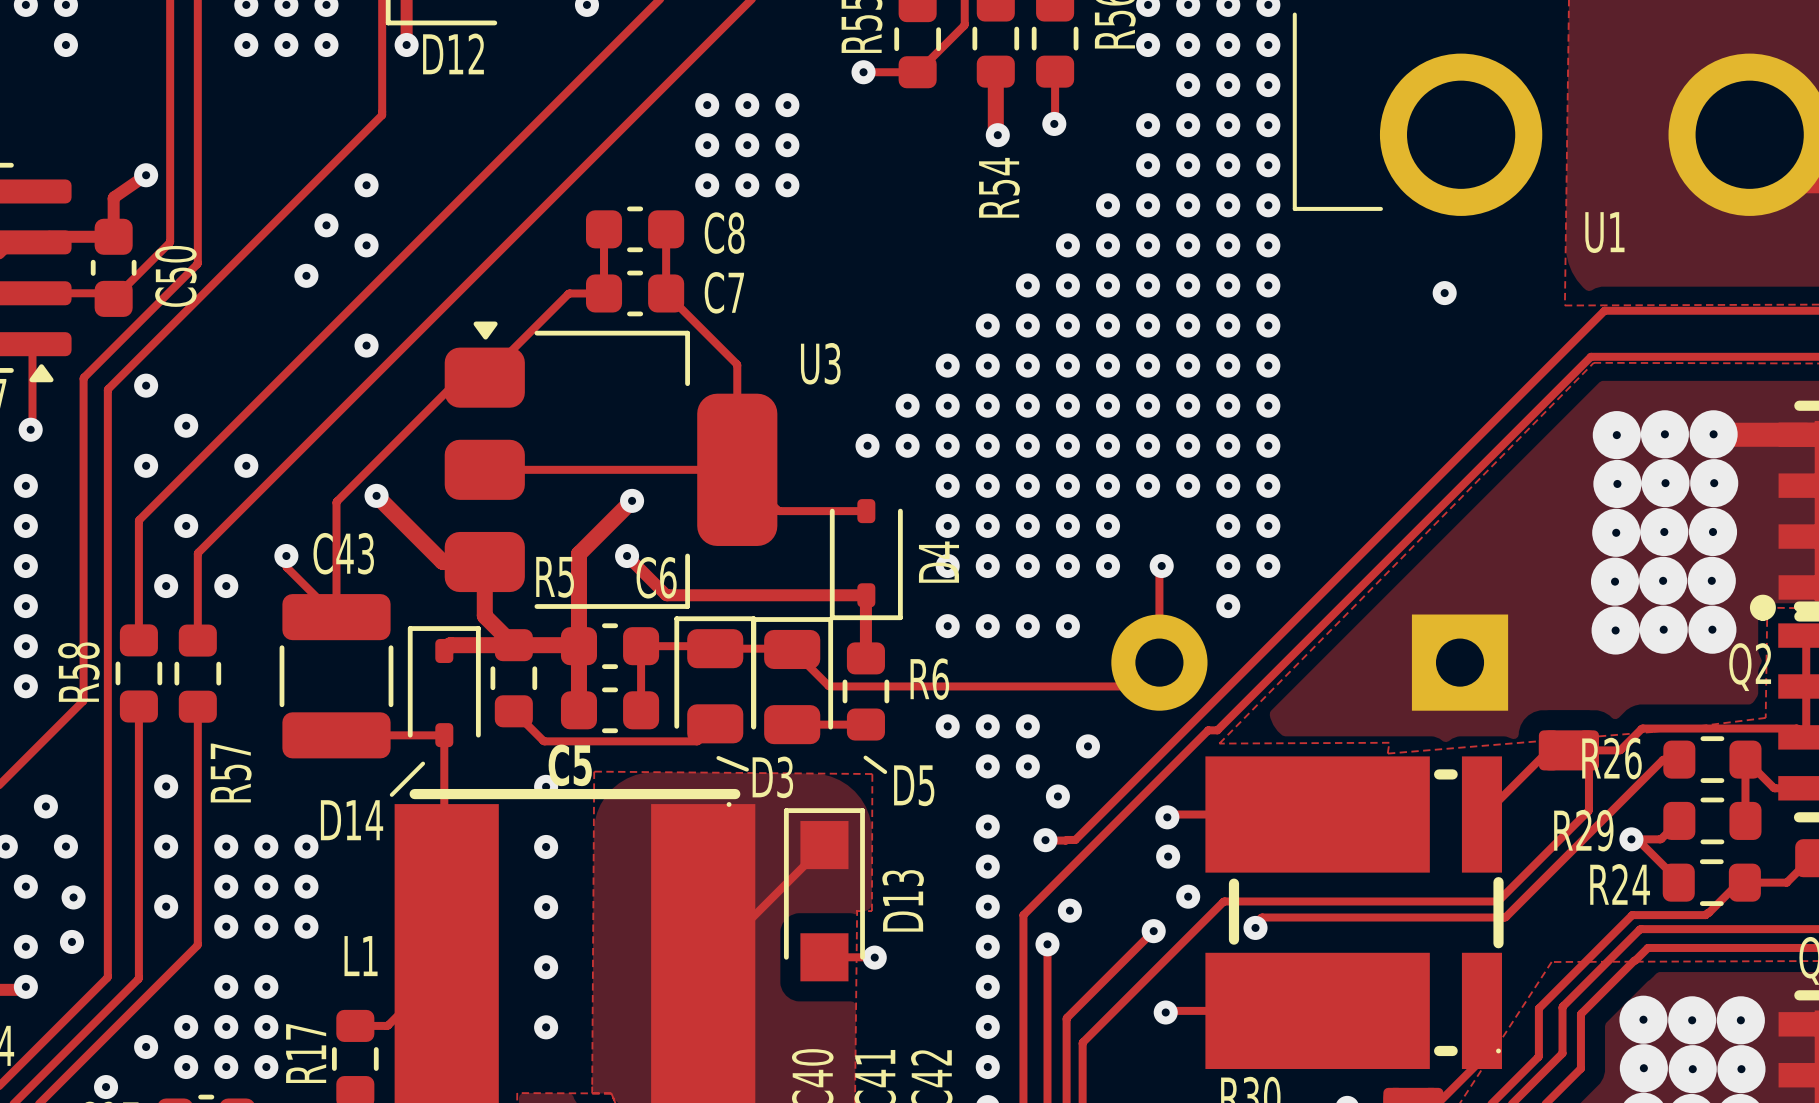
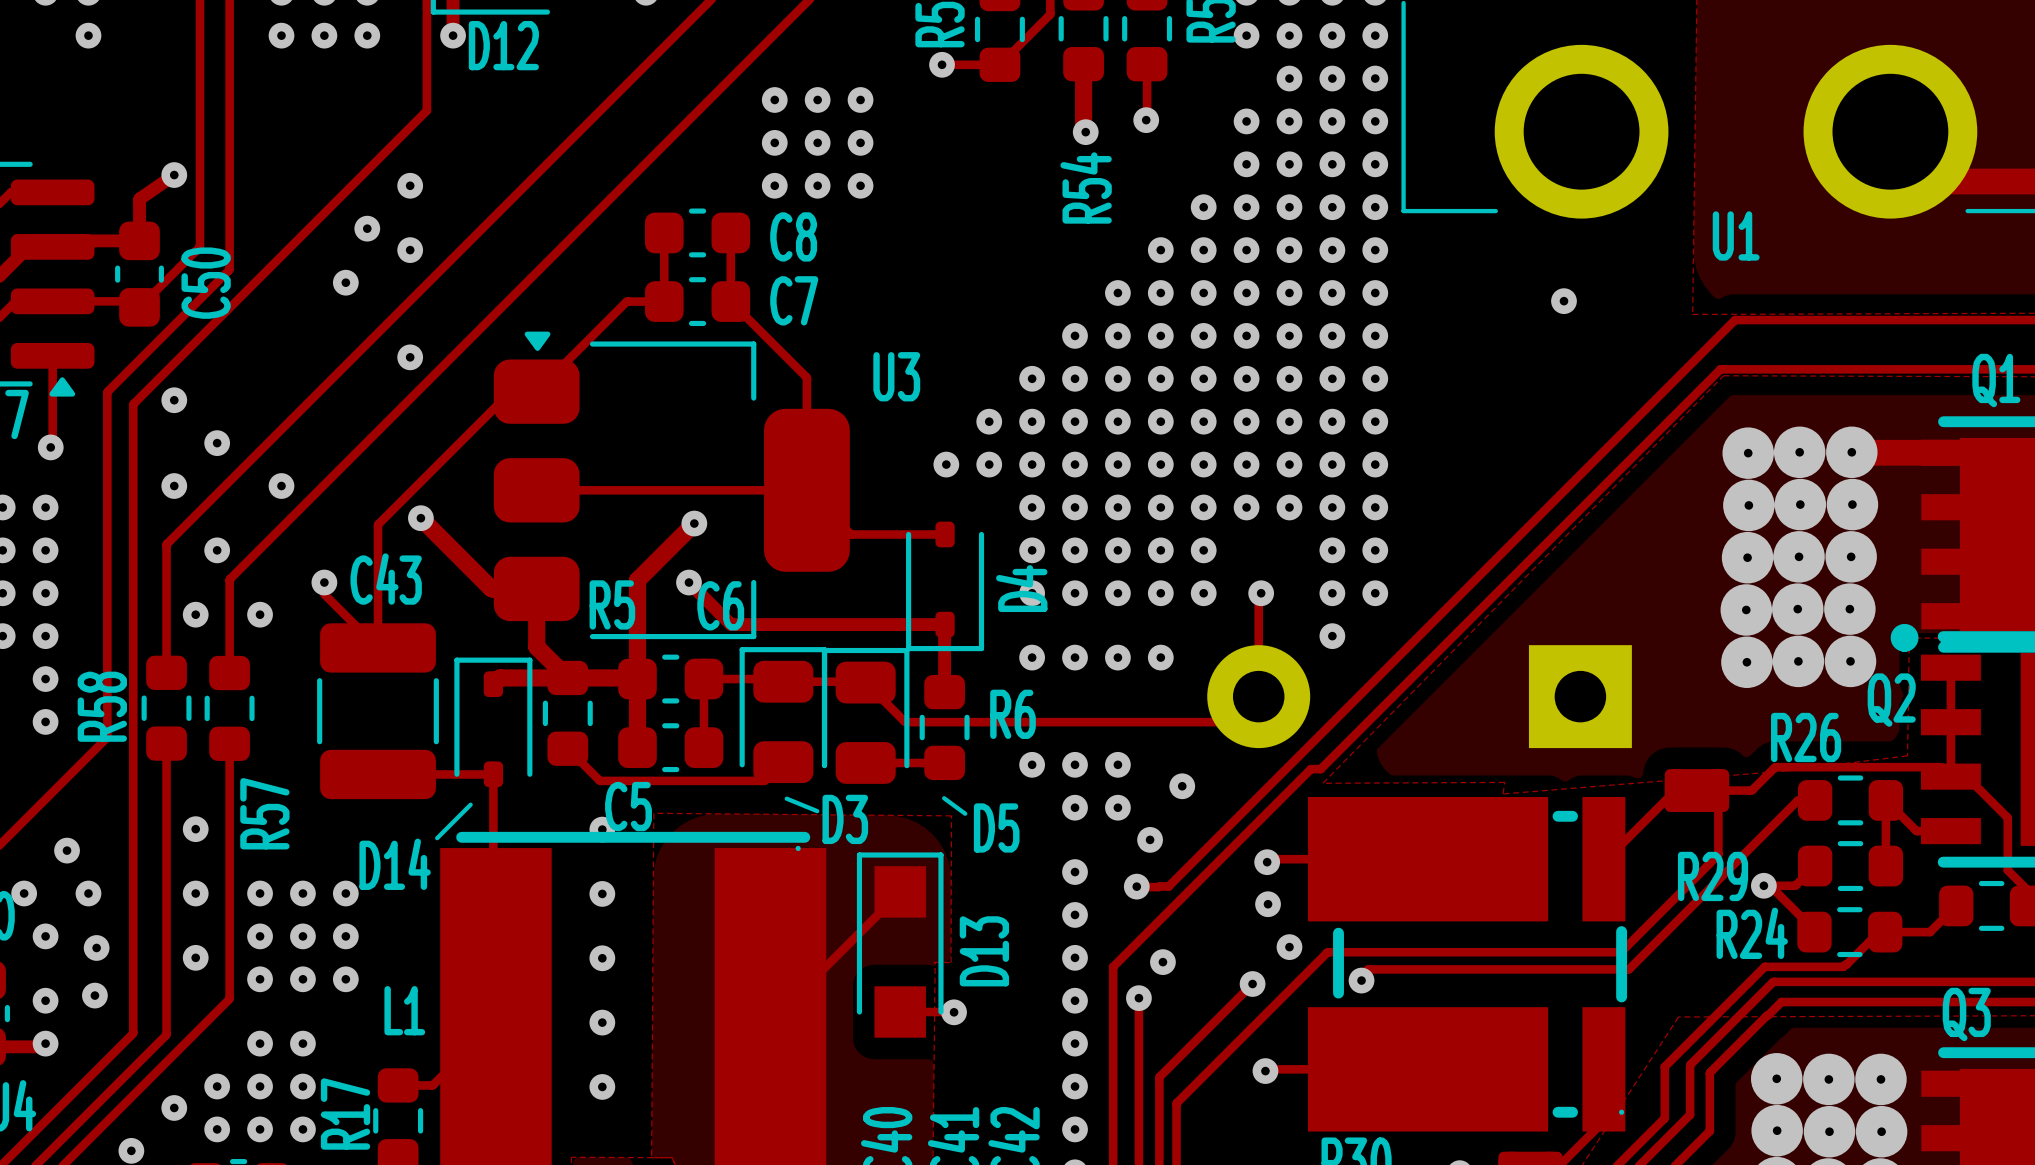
R26 name position: R26 (1611, 758) -> R26 (1806, 737)

